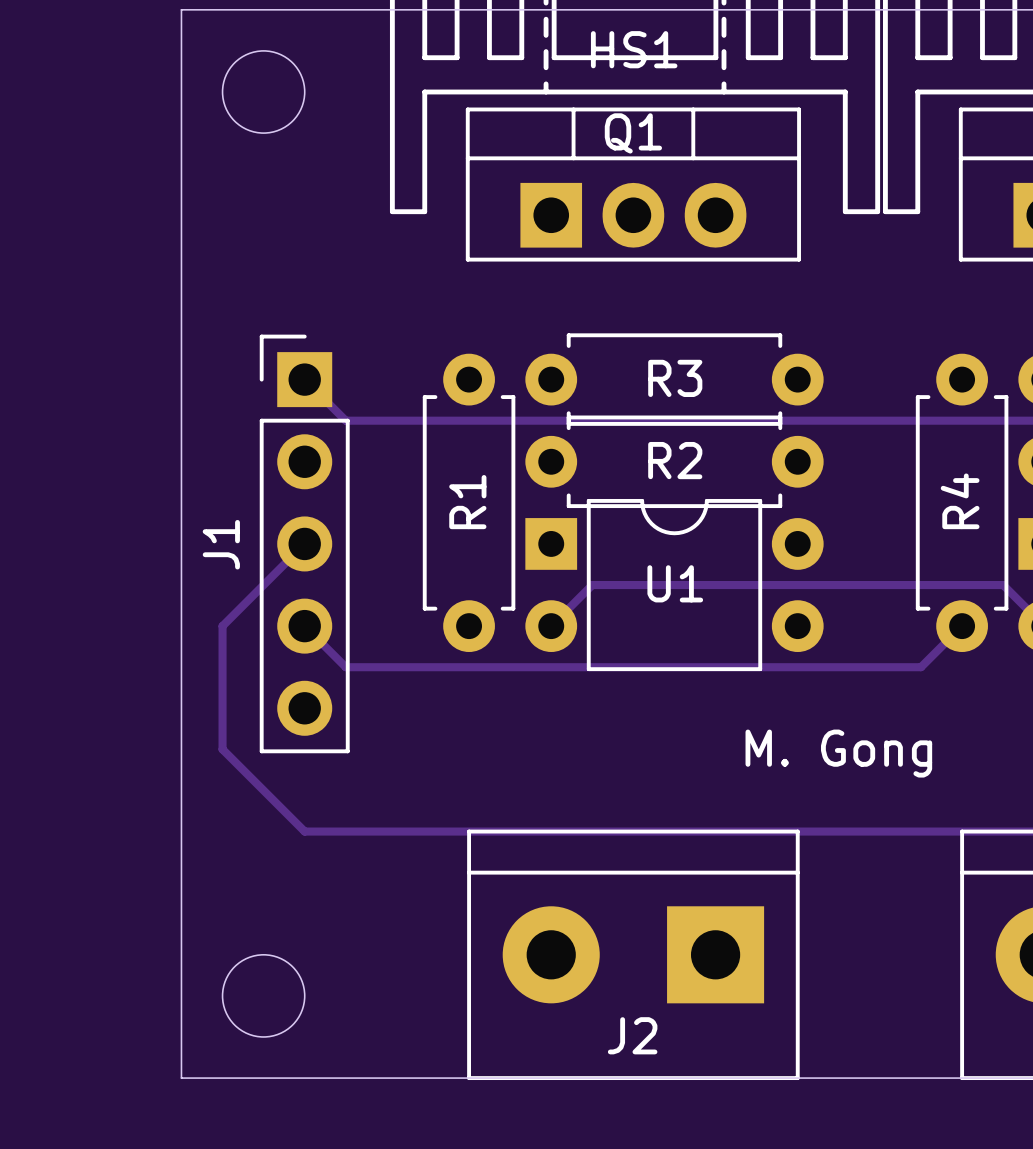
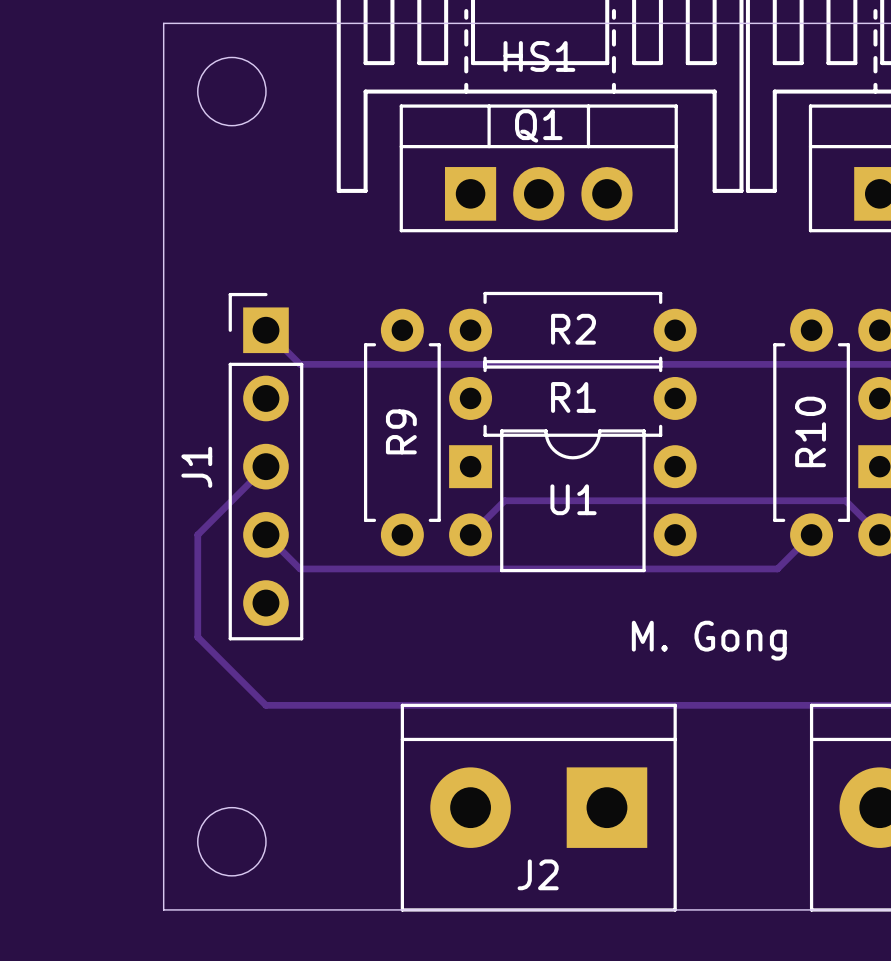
R3 name: R3 (675, 378) -> R2 (573, 329)
R2 name: R2 (675, 460) -> R1 (573, 397)
R4 name: R4 (960, 501) -> R10 (810, 431)
R1 name: R1 (467, 502) -> R9 (401, 431)

